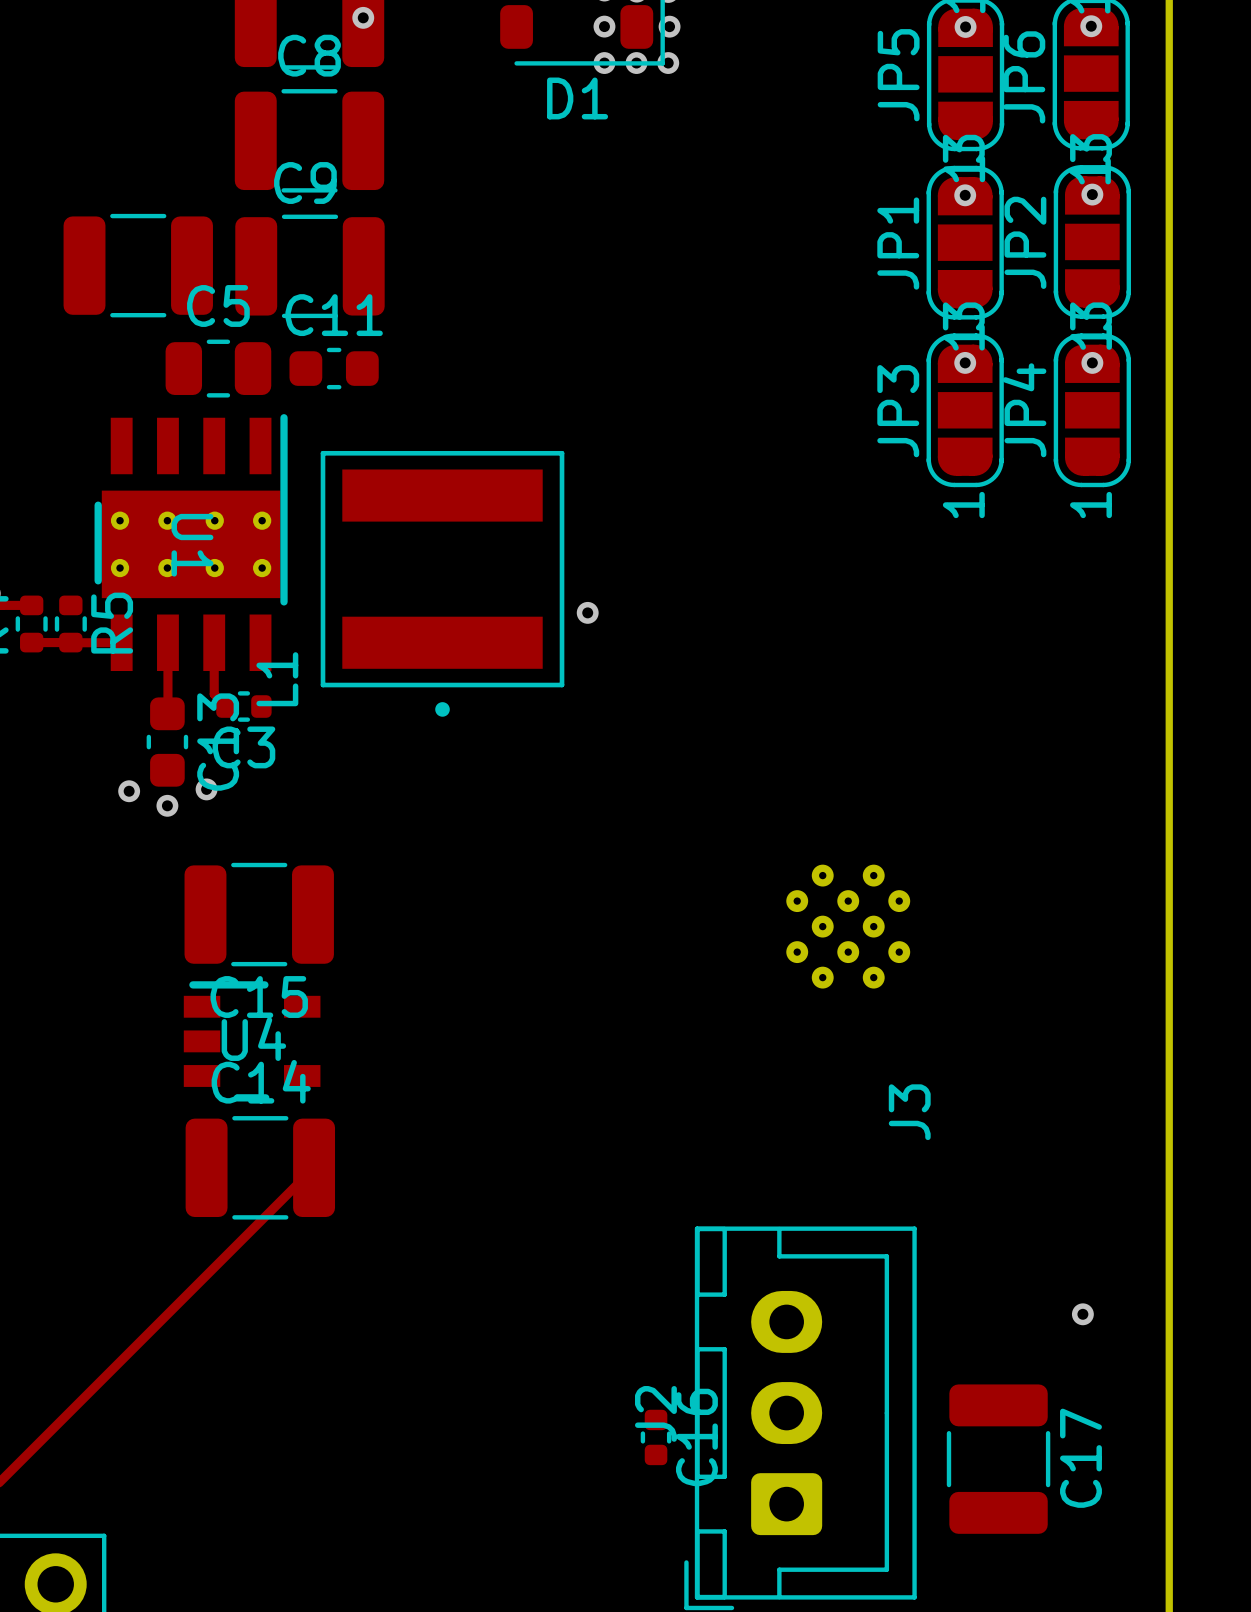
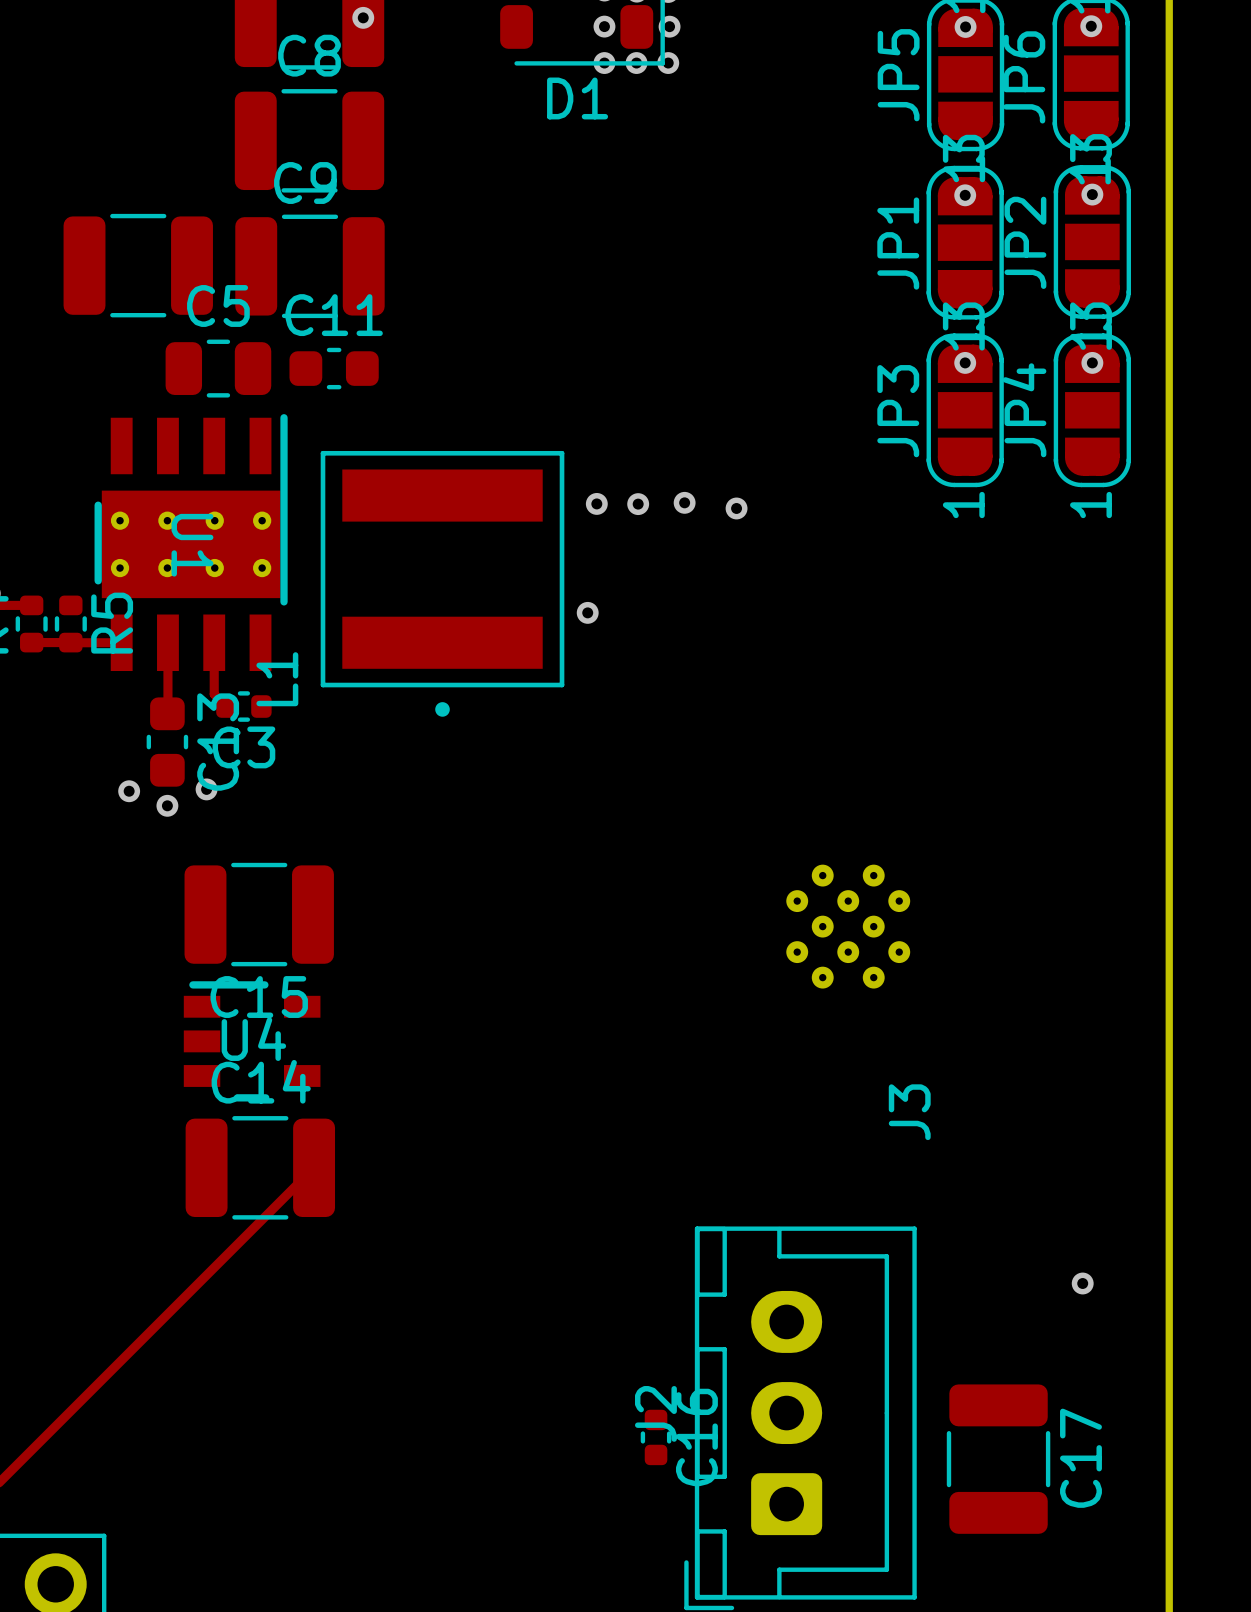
via: none -> (684, 502)
via: none -> (596, 503)
via: none -> (638, 504)
via: none -> (736, 508)
via position: (1082, 1314) -> (1082, 1283)

